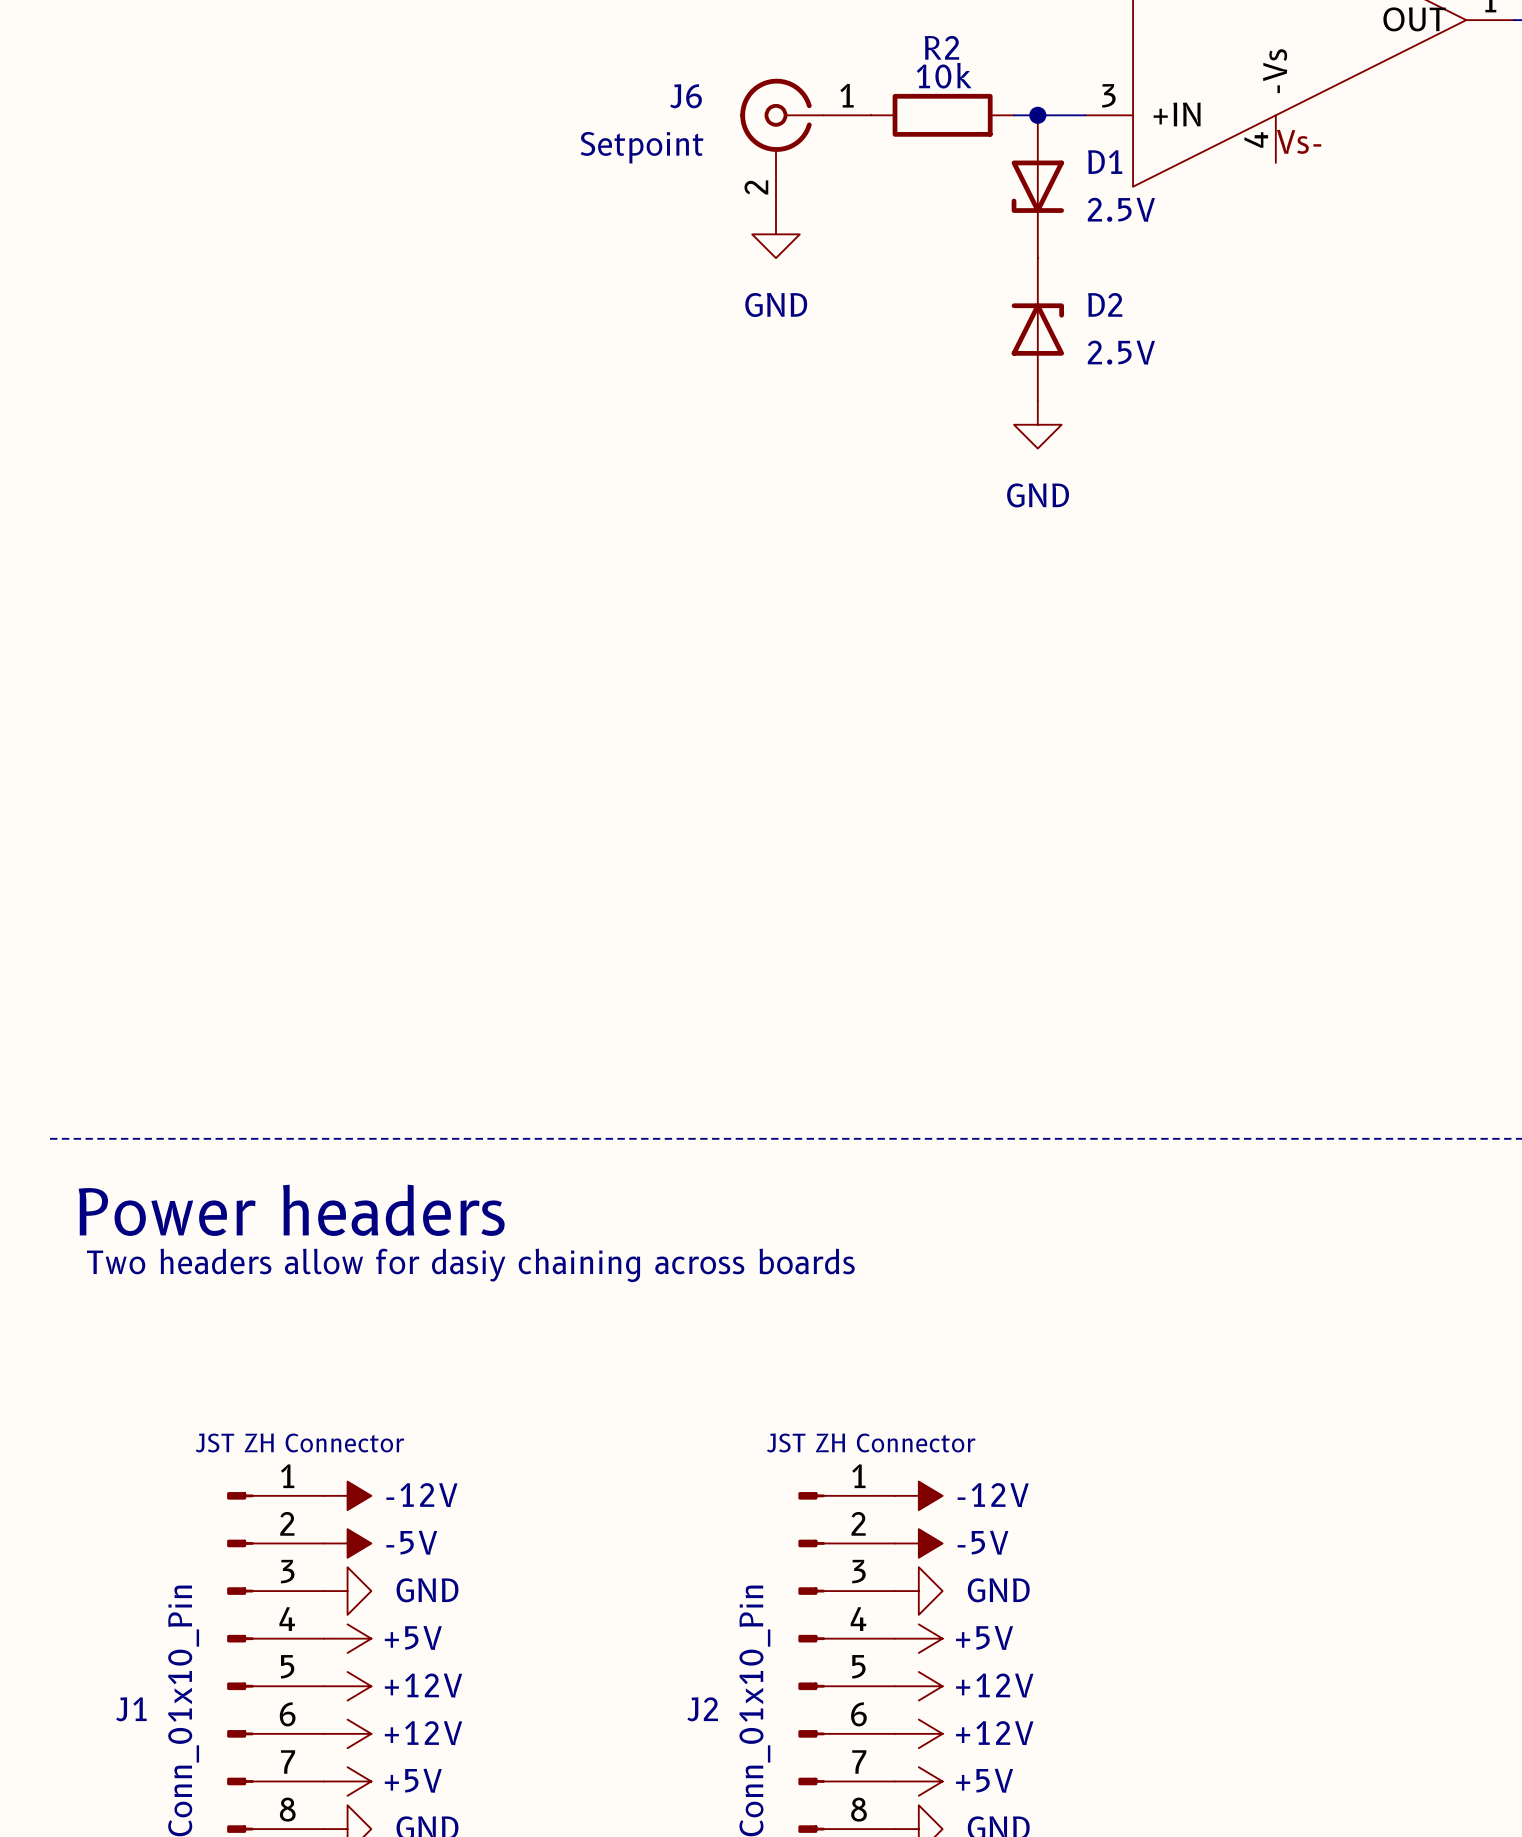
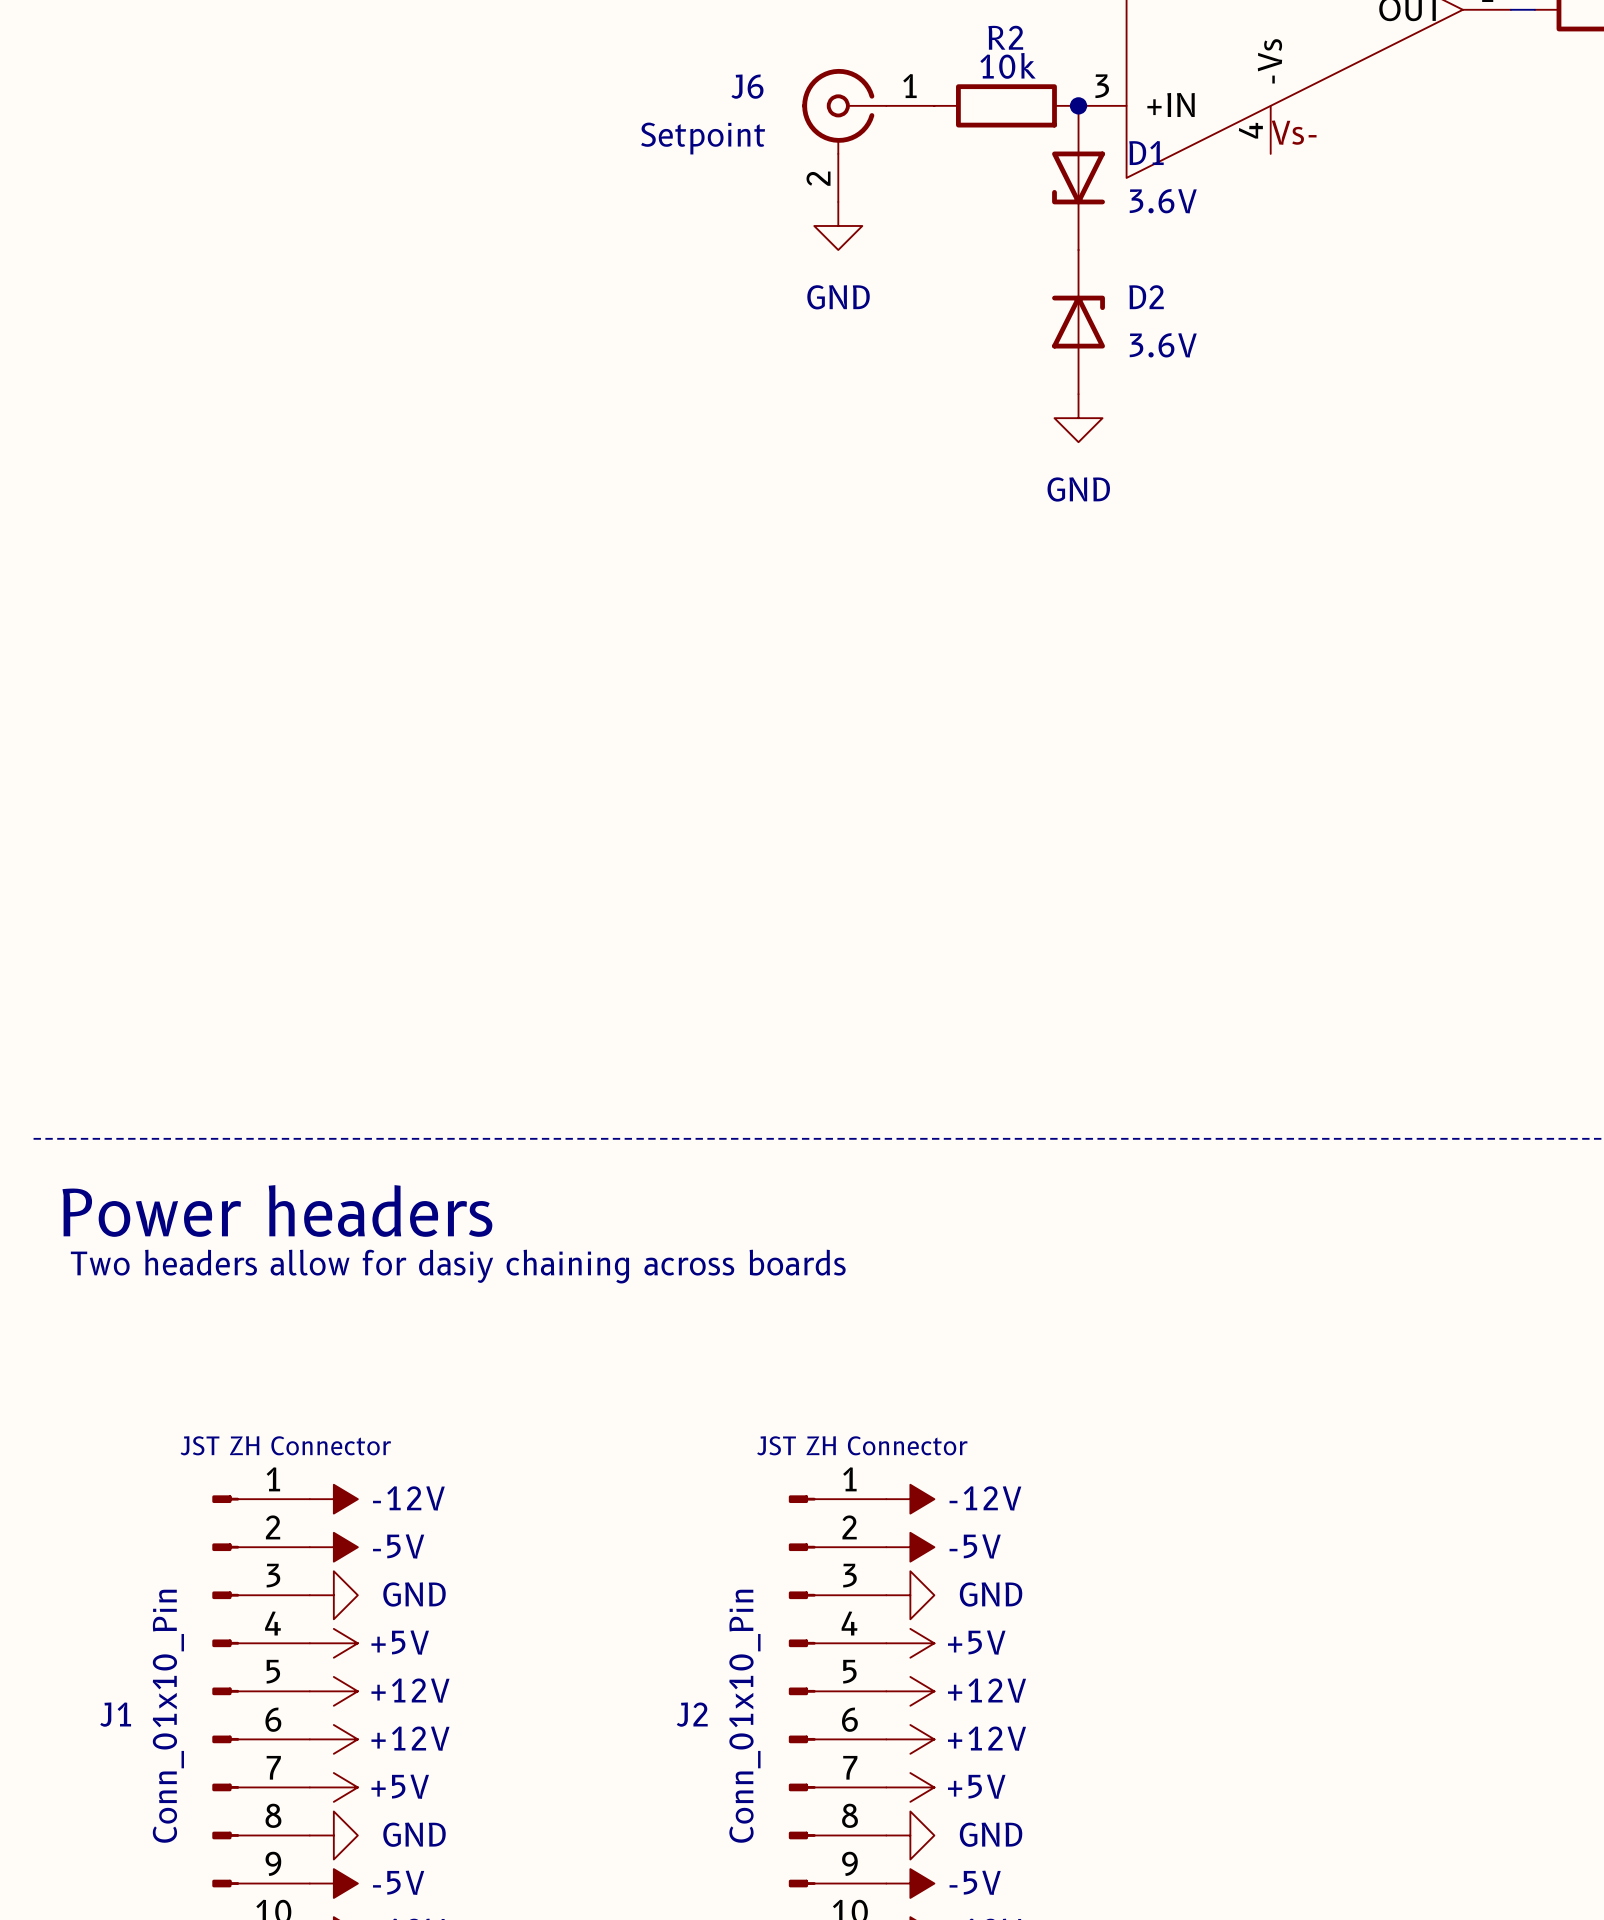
R2 position: (942, 115) -> (1006, 105)
wire: (1014, 115) (1085, 115) -> none
junction position: (1037, 115) -> (1078, 105)
J6 position: (805, 144) -> (868, 135)
D1 position: (1037, 186) -> (1078, 177)
D1 value: 2.5V (1121, 209) -> 3.6V (1163, 201)
power symbol position: GND (775, 234) -> GND (838, 225)
D2 position: (1037, 329) -> (1078, 322)
D2 value: 2.5V (1121, 352) -> 3.6V (1163, 345)
power symbol position: GND (1037, 424) -> GND (1078, 418)

